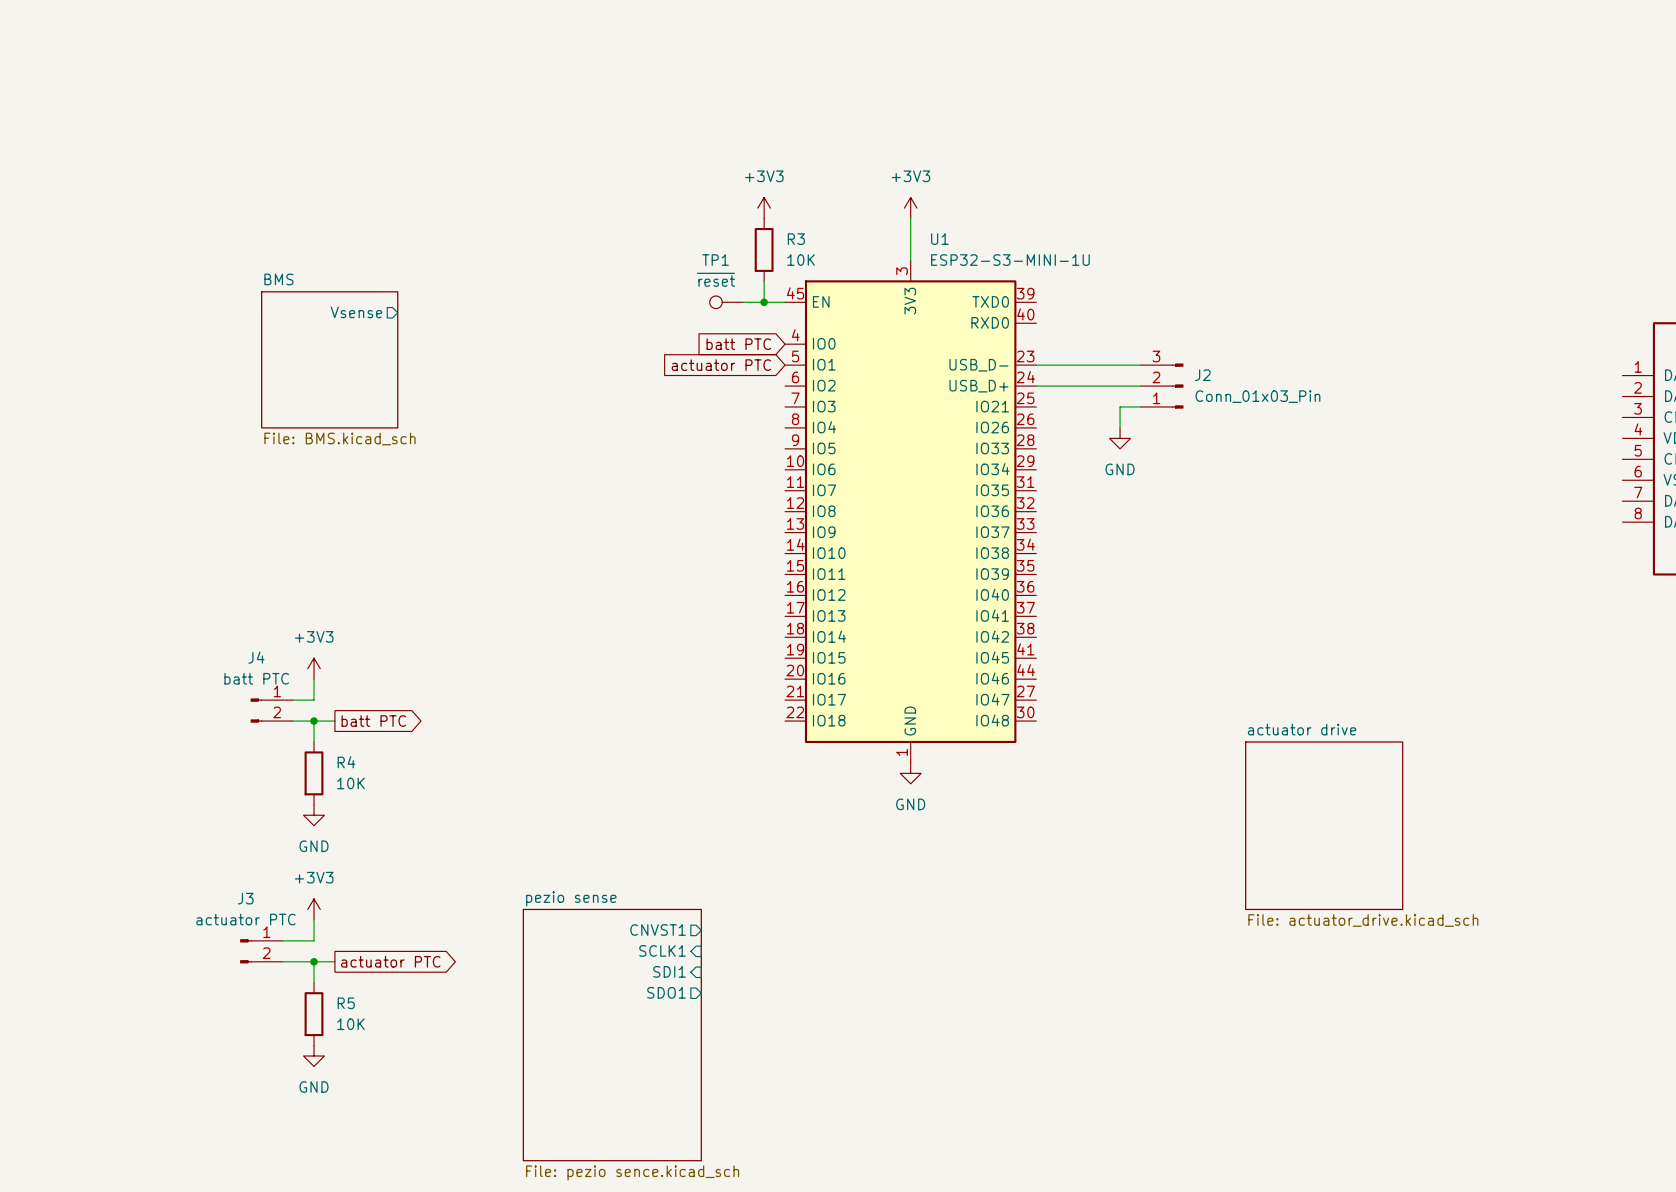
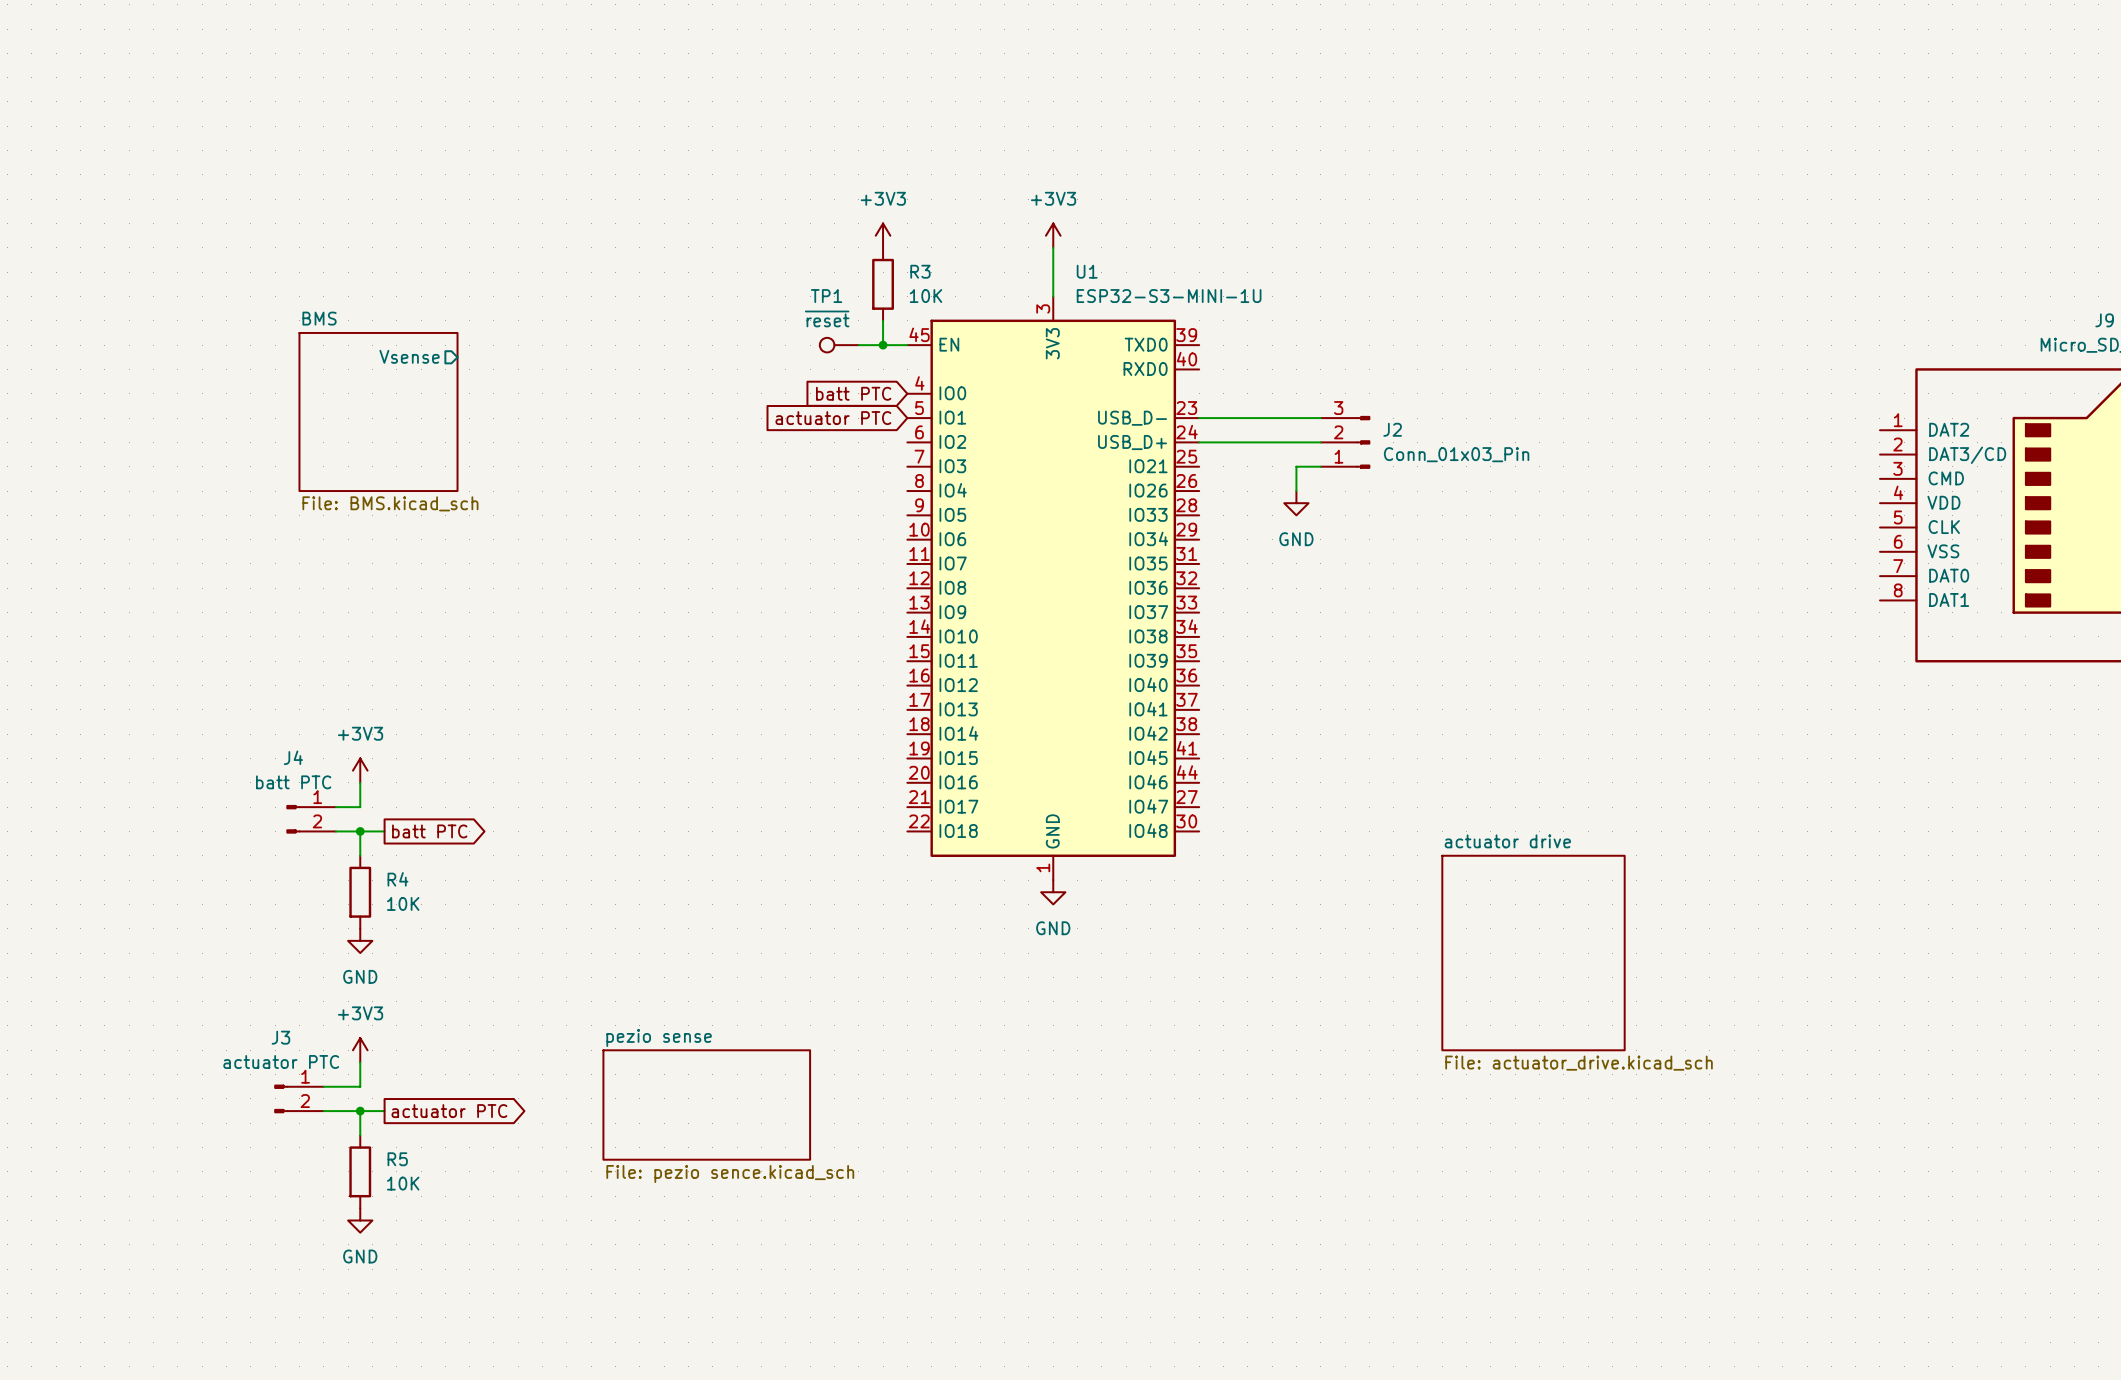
sheet pin: CNVST1 (658, 930) -> none
sheet pin: SCLK1 (662, 950) -> none
sheet pezio sense: none -> File: pezio sence.kicad_sch (706, 1105)
sheet pin: SDI1 (669, 971) -> none
sheet pin: SDO1 (666, 992) -> none
sheet pezio sense: File: pezio sence.kicad_sch (612, 1035) -> none

